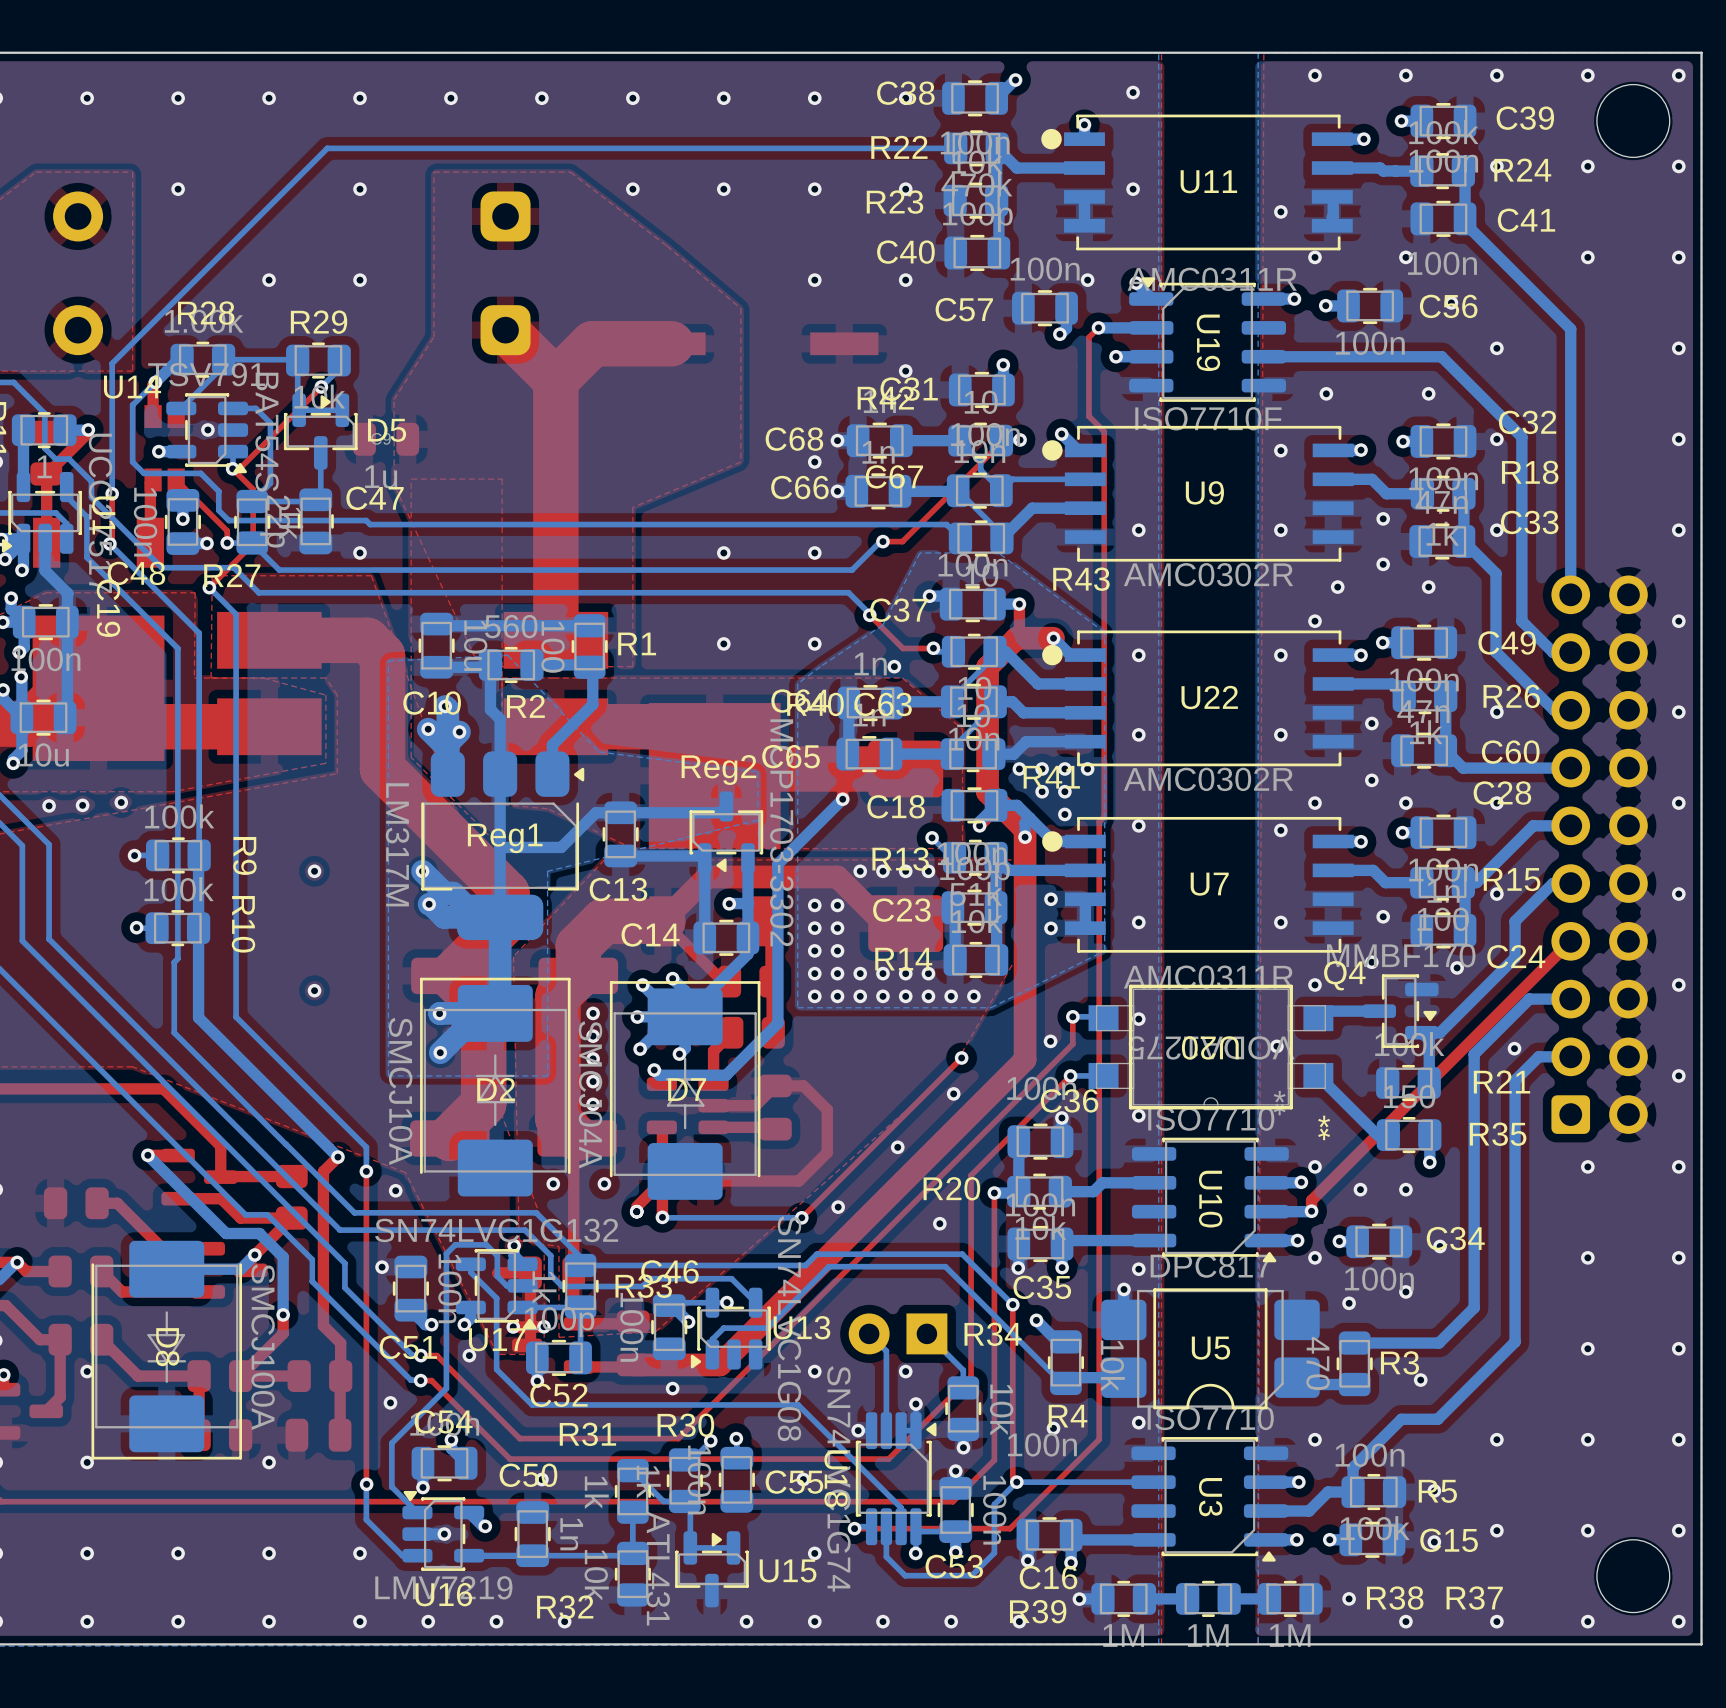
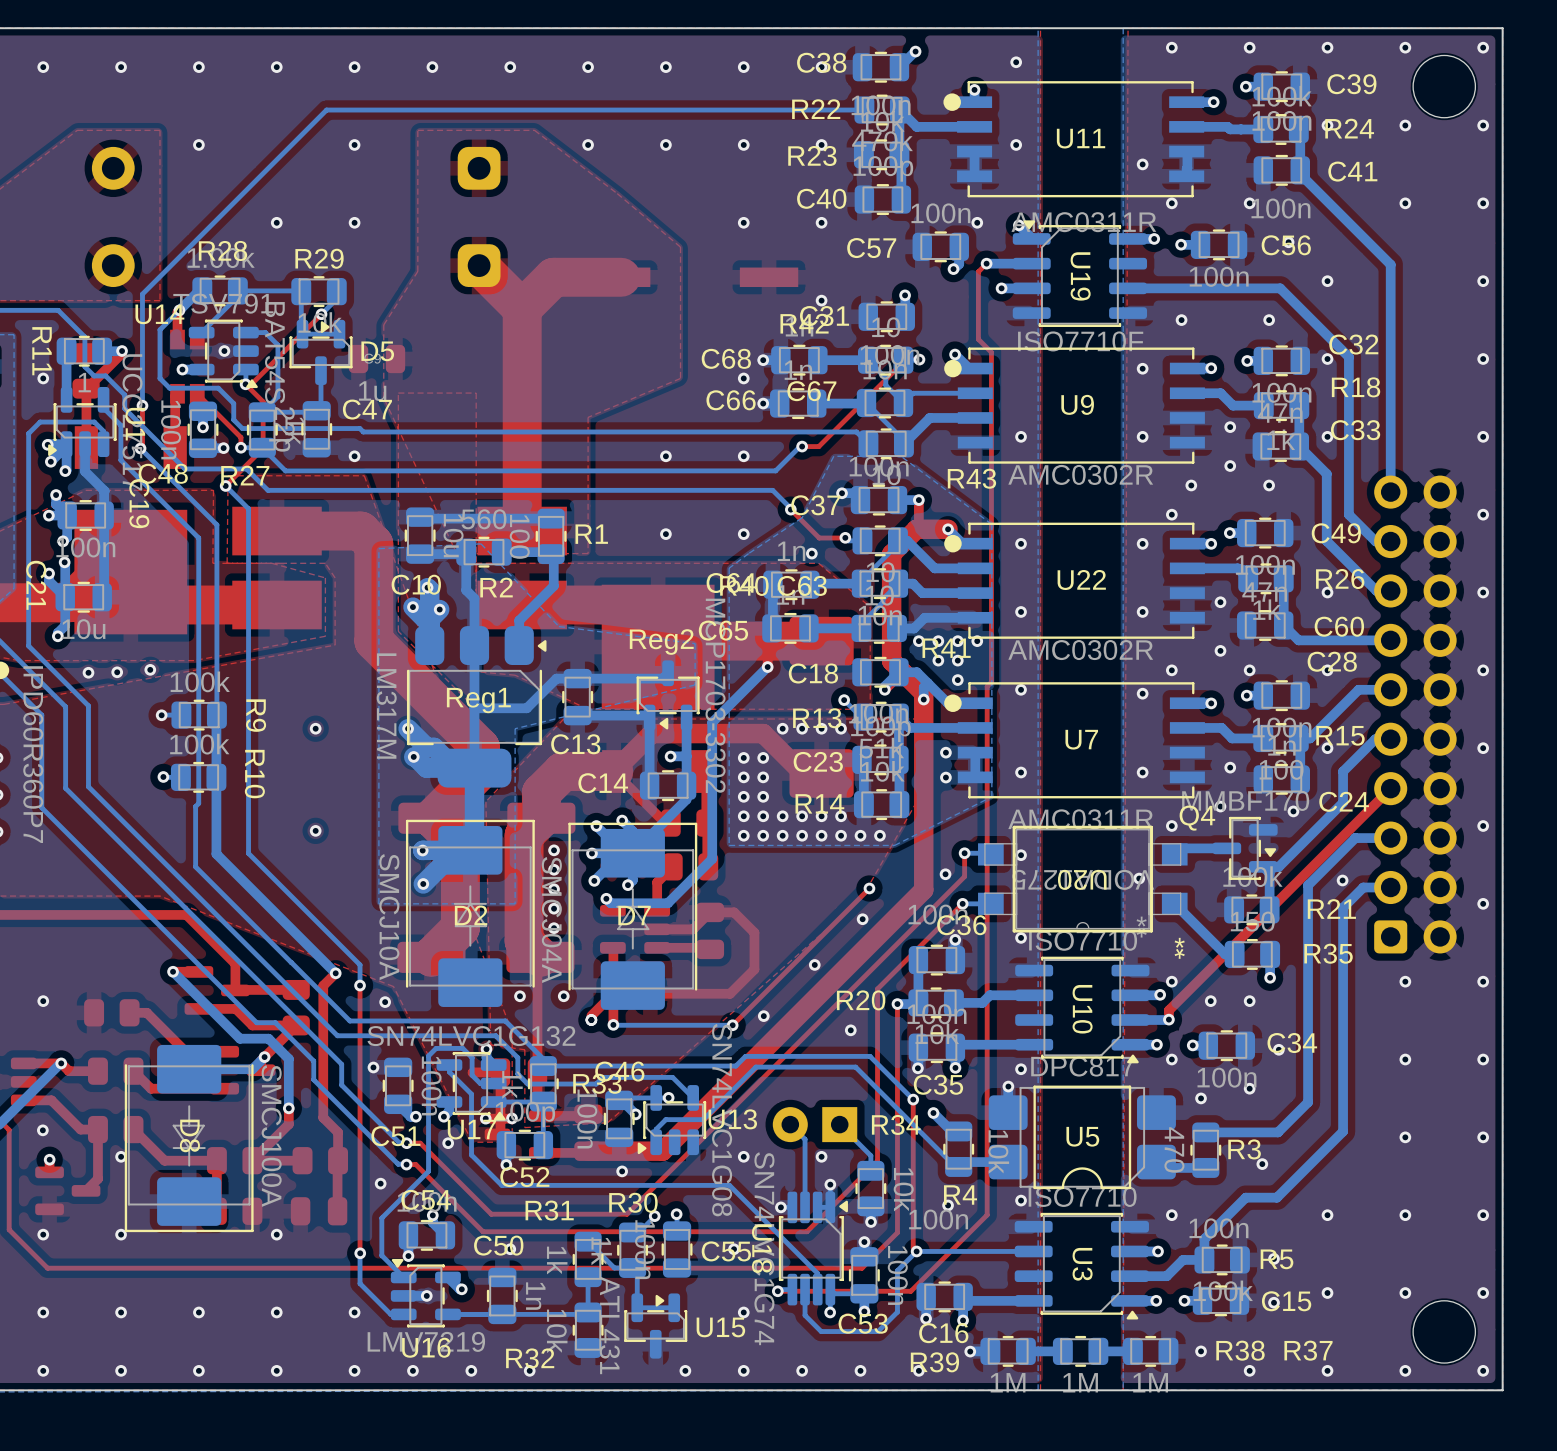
U11 footprint: [1041, 114, 1353, 251] -> [943, 81, 1205, 198]
U9 footprint: [1042, 425, 1354, 562] -> [944, 347, 1205, 464]
U22 footprint: [1042, 630, 1354, 767] -> [944, 522, 1205, 639]
U7 footprint: [1042, 816, 1354, 953] -> [944, 682, 1205, 799]

